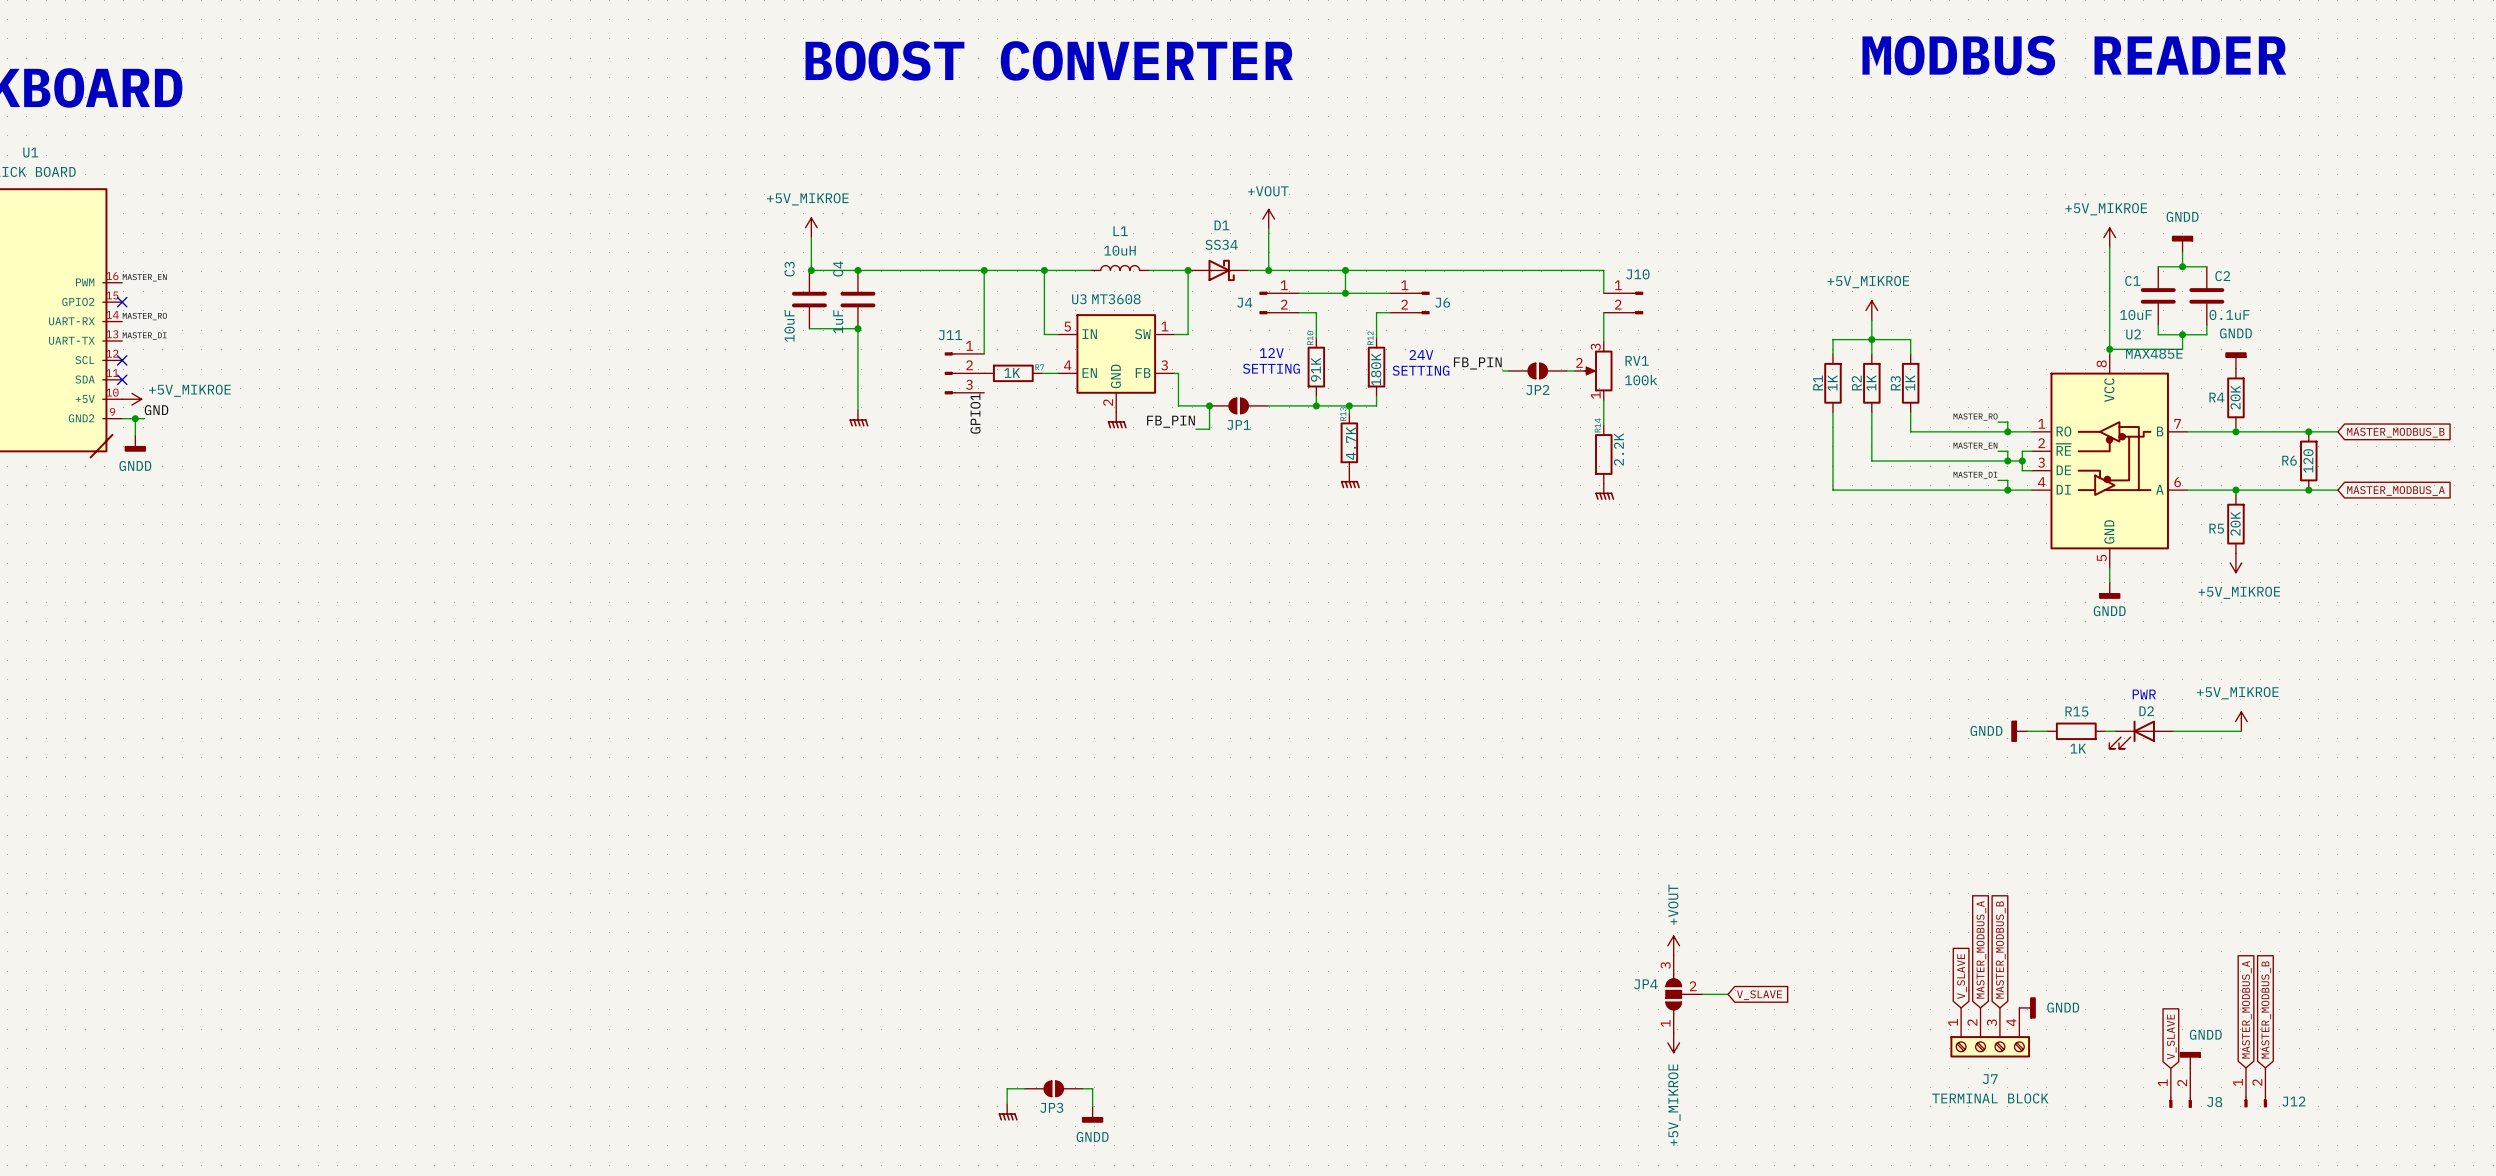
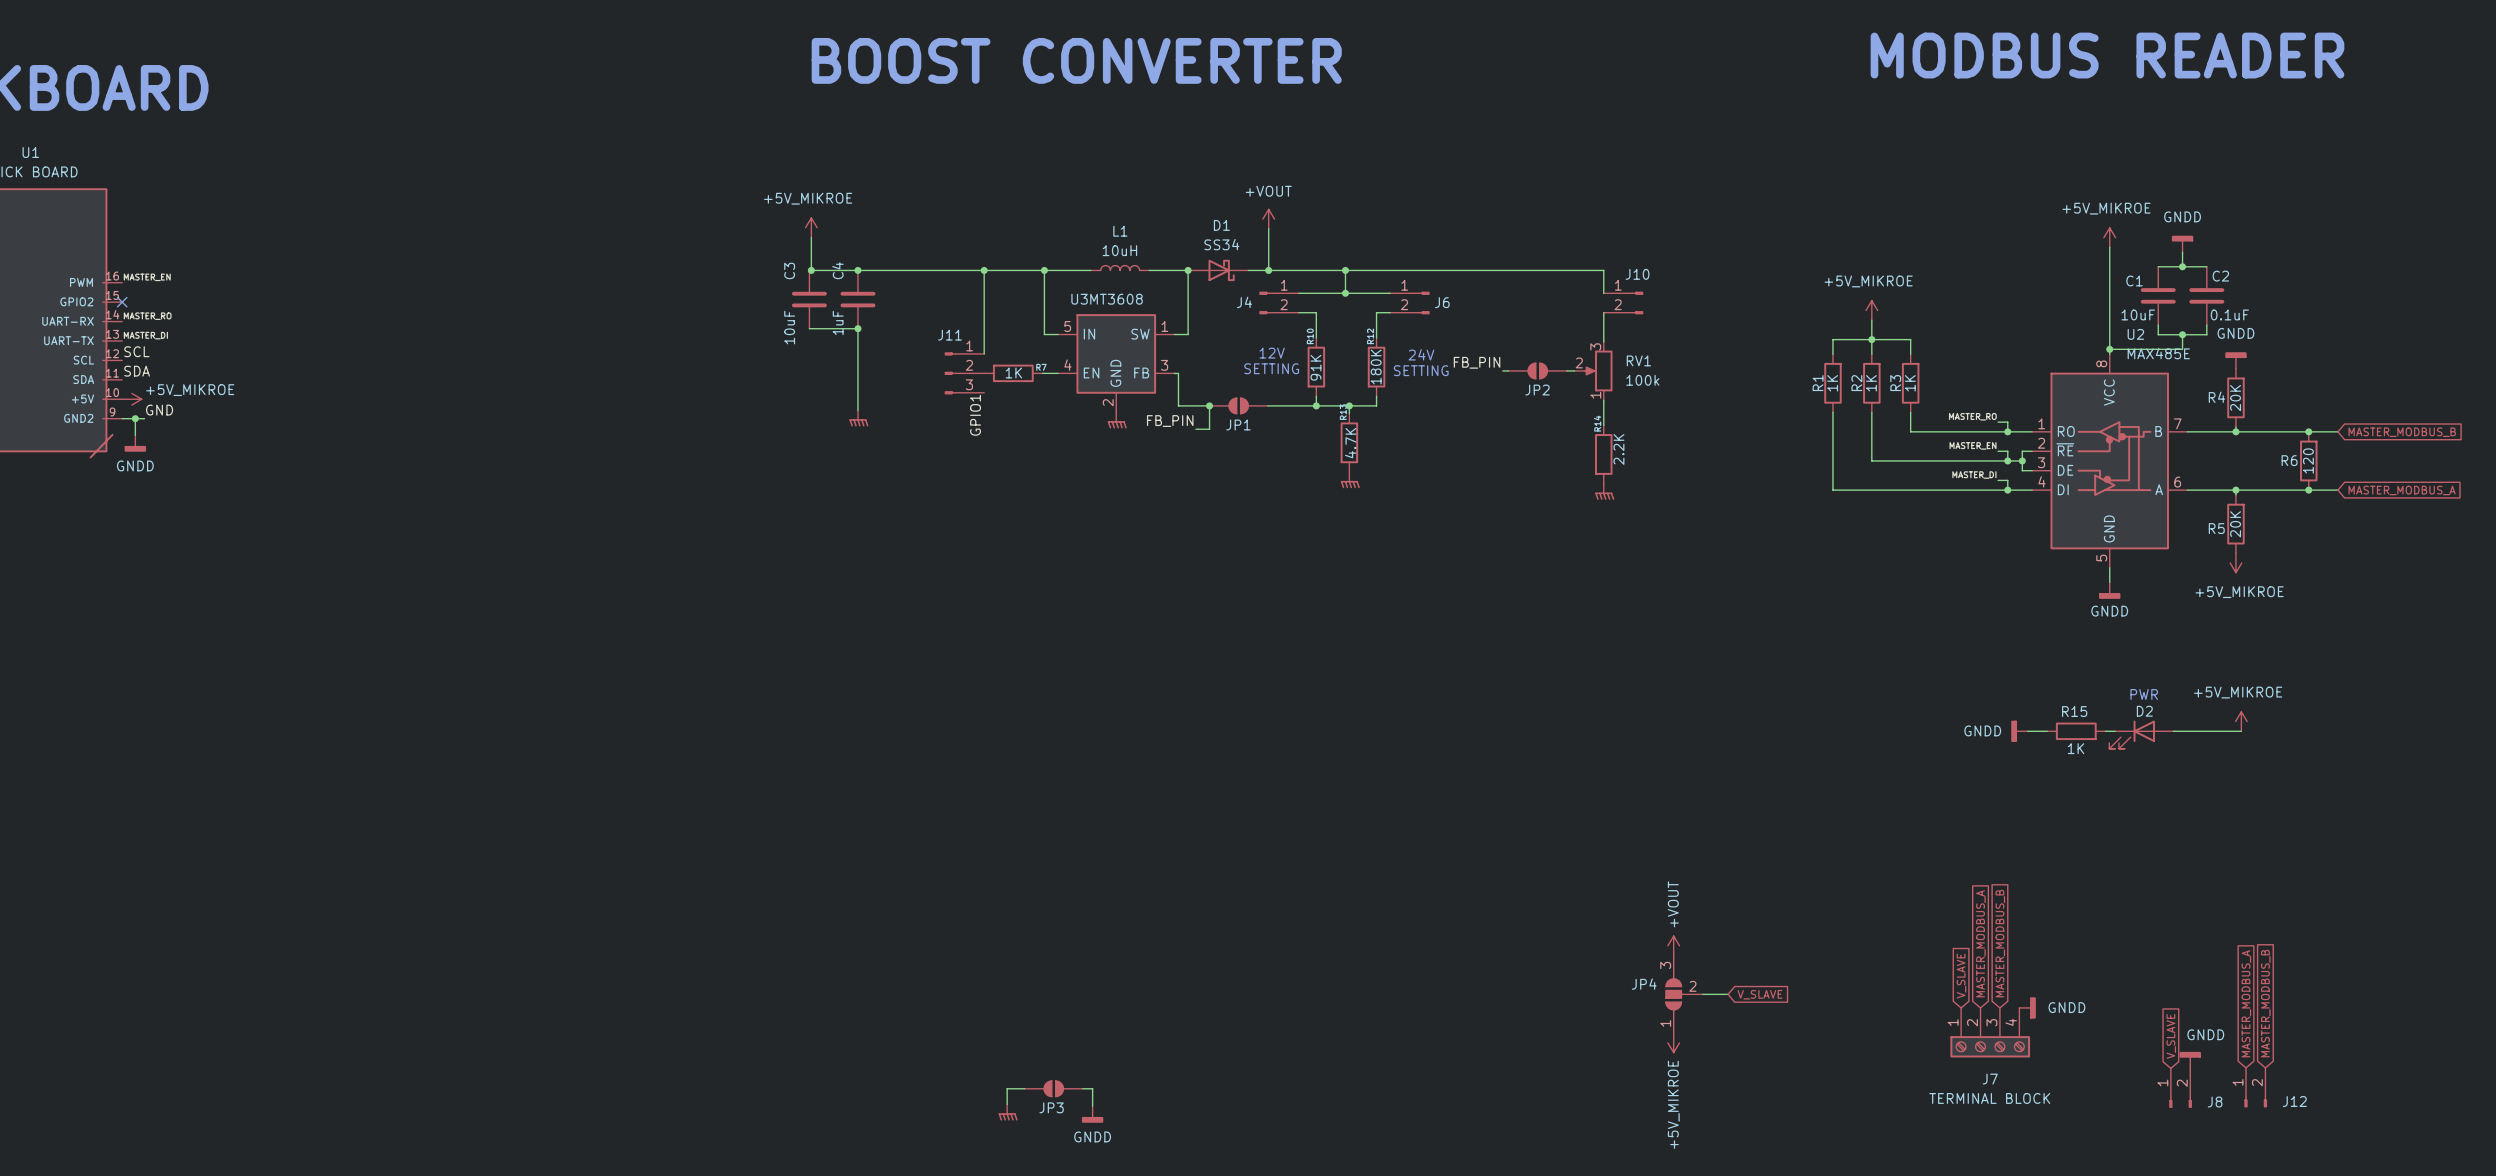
label: none -> SCL (136, 351)
no-connect mark: (122, 360) -> none
label: none -> SDA (137, 371)
no-connect mark: (122, 379) -> none

